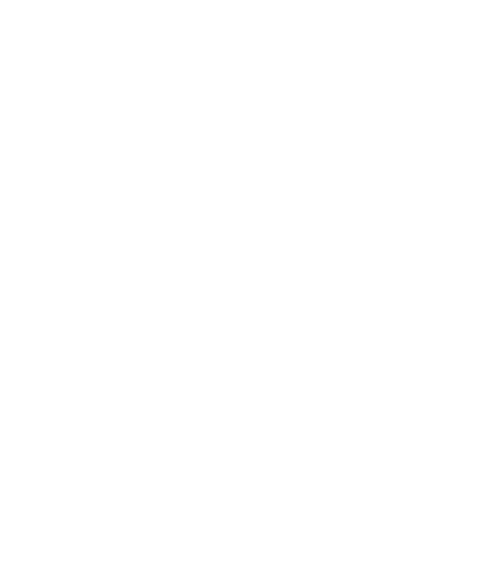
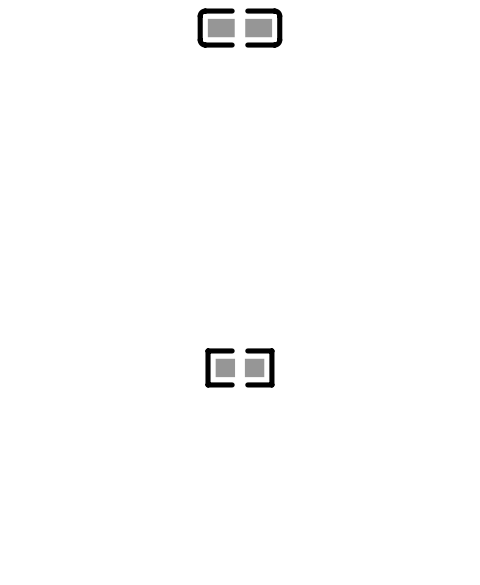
part: none -> (239, 28)
part: none -> (239, 367)

